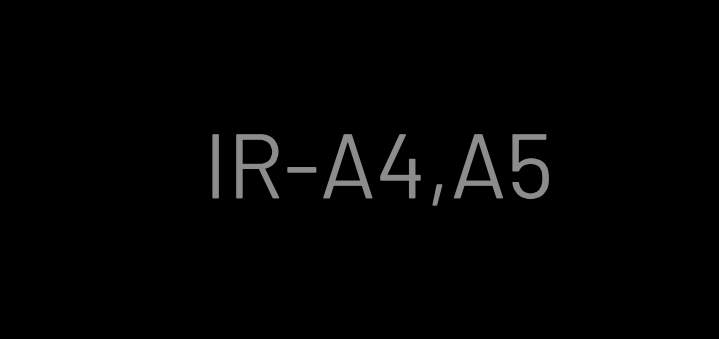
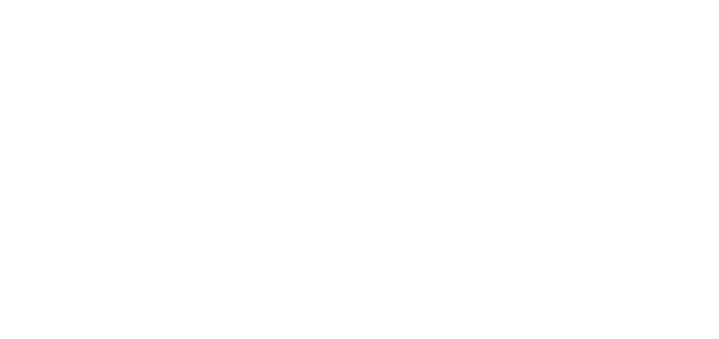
text: IR-A4,A5 (380, 169) -> none

